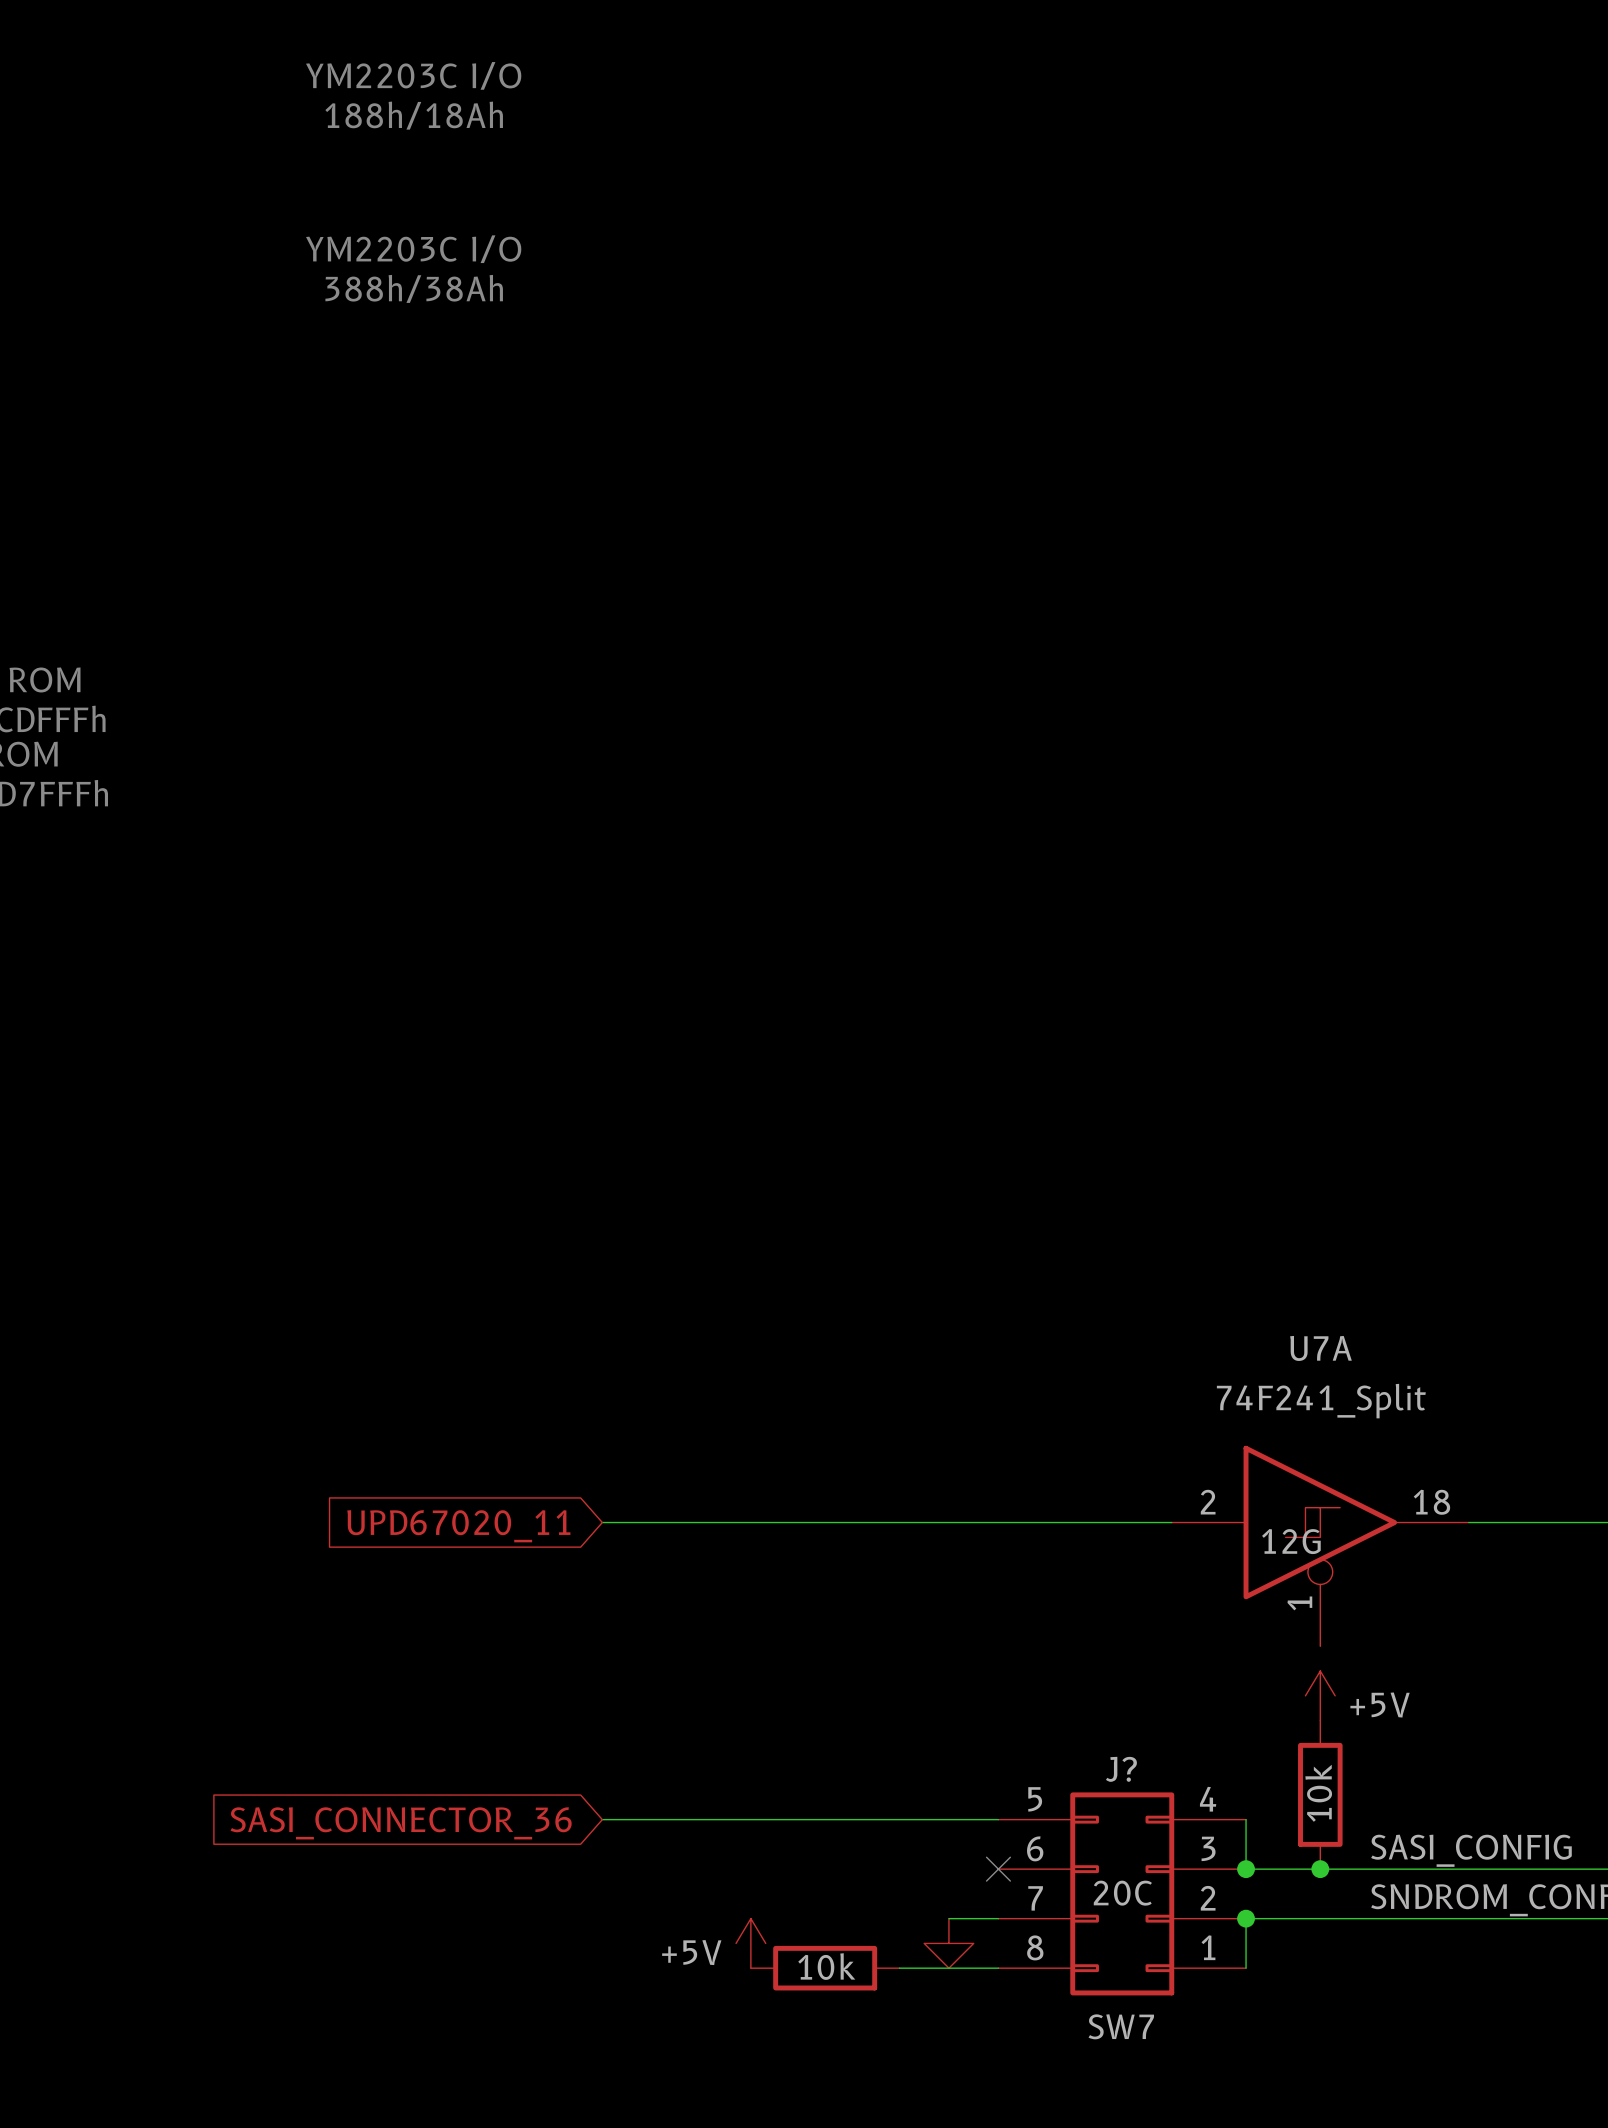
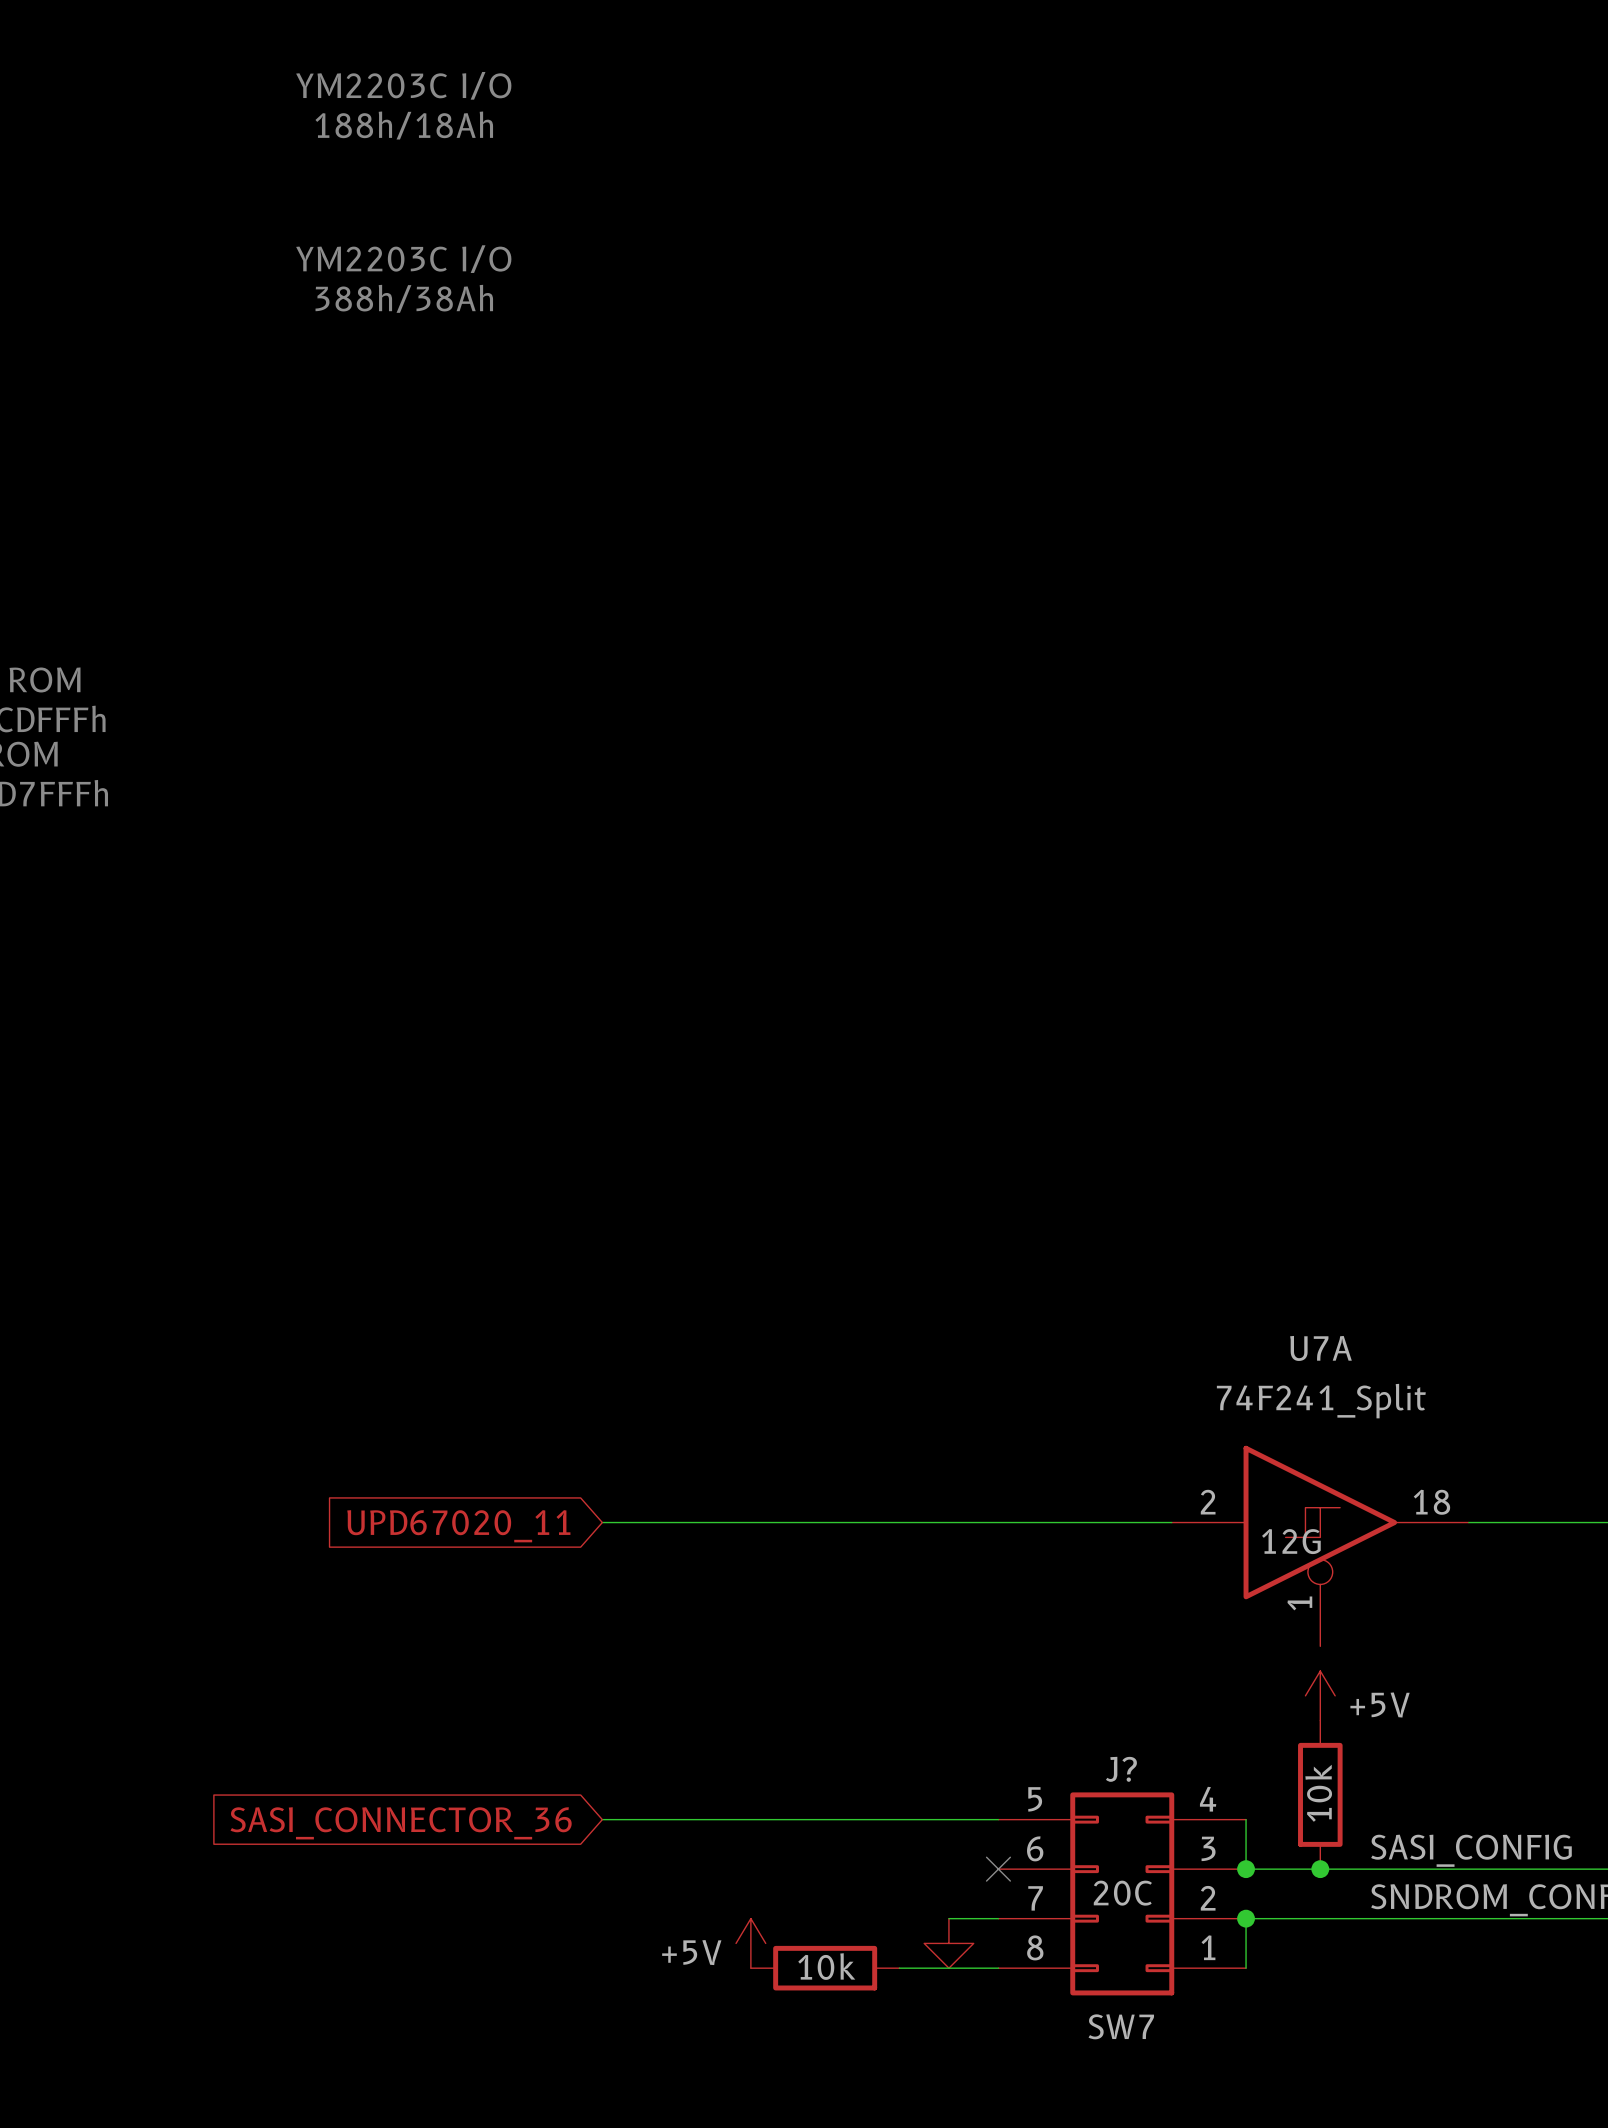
text position: YM2203C I/O (413, 75) -> YM2203C I/O (403, 85)
text position: 188h/18Ah (414, 115) -> 188h/18Ah (404, 125)
text position: YM2203C I/O (413, 249) -> YM2203C I/O (403, 259)
text position: 388h/38Ah (414, 288) -> 388h/38Ah (404, 298)

